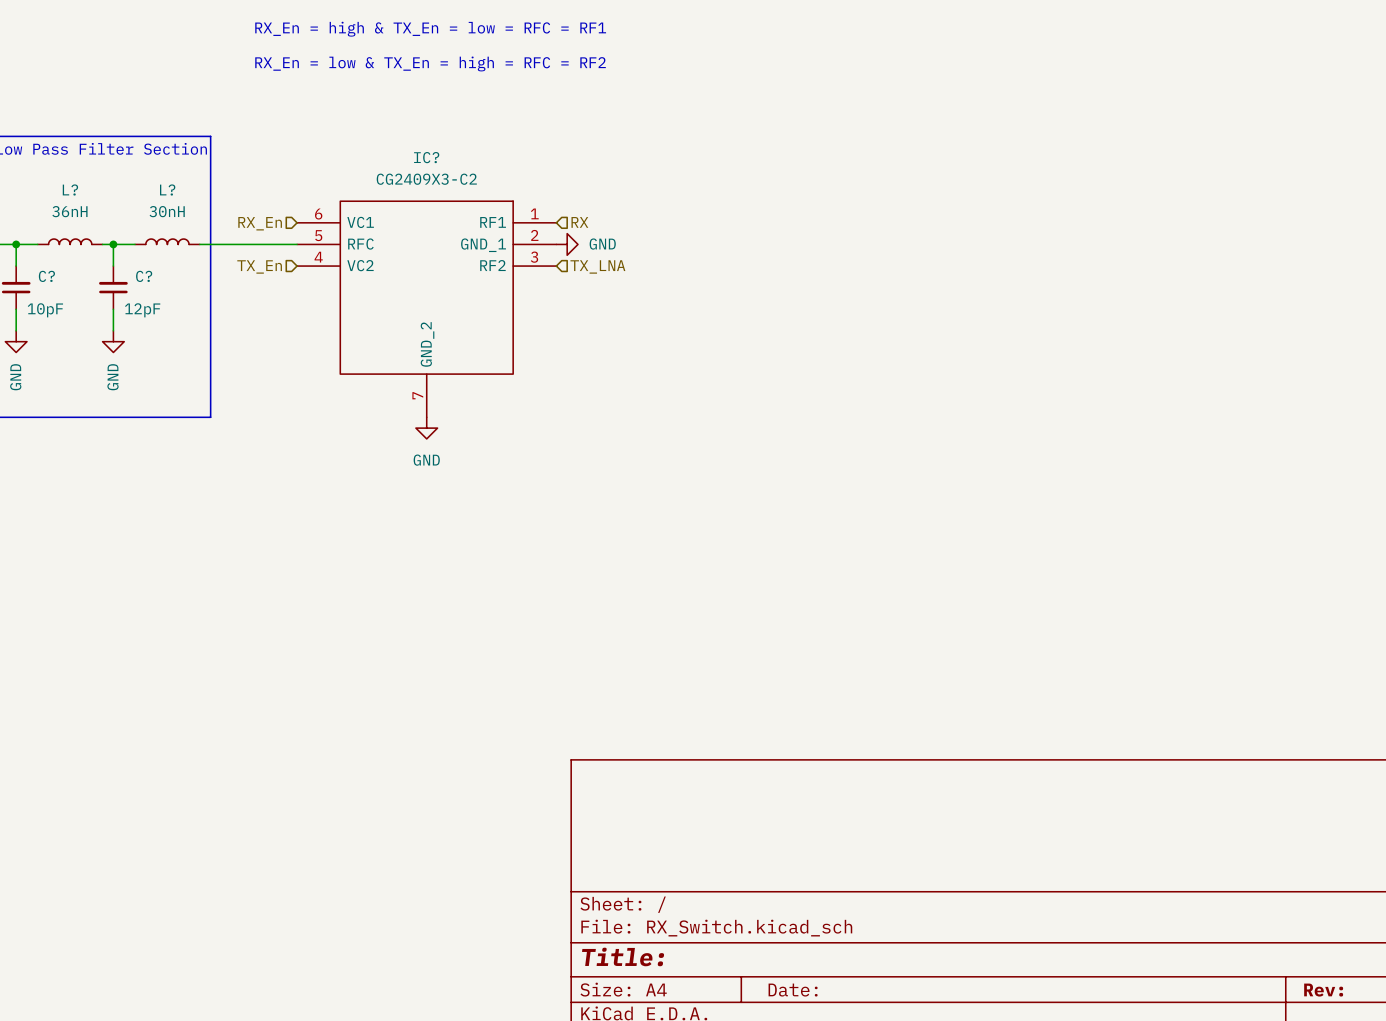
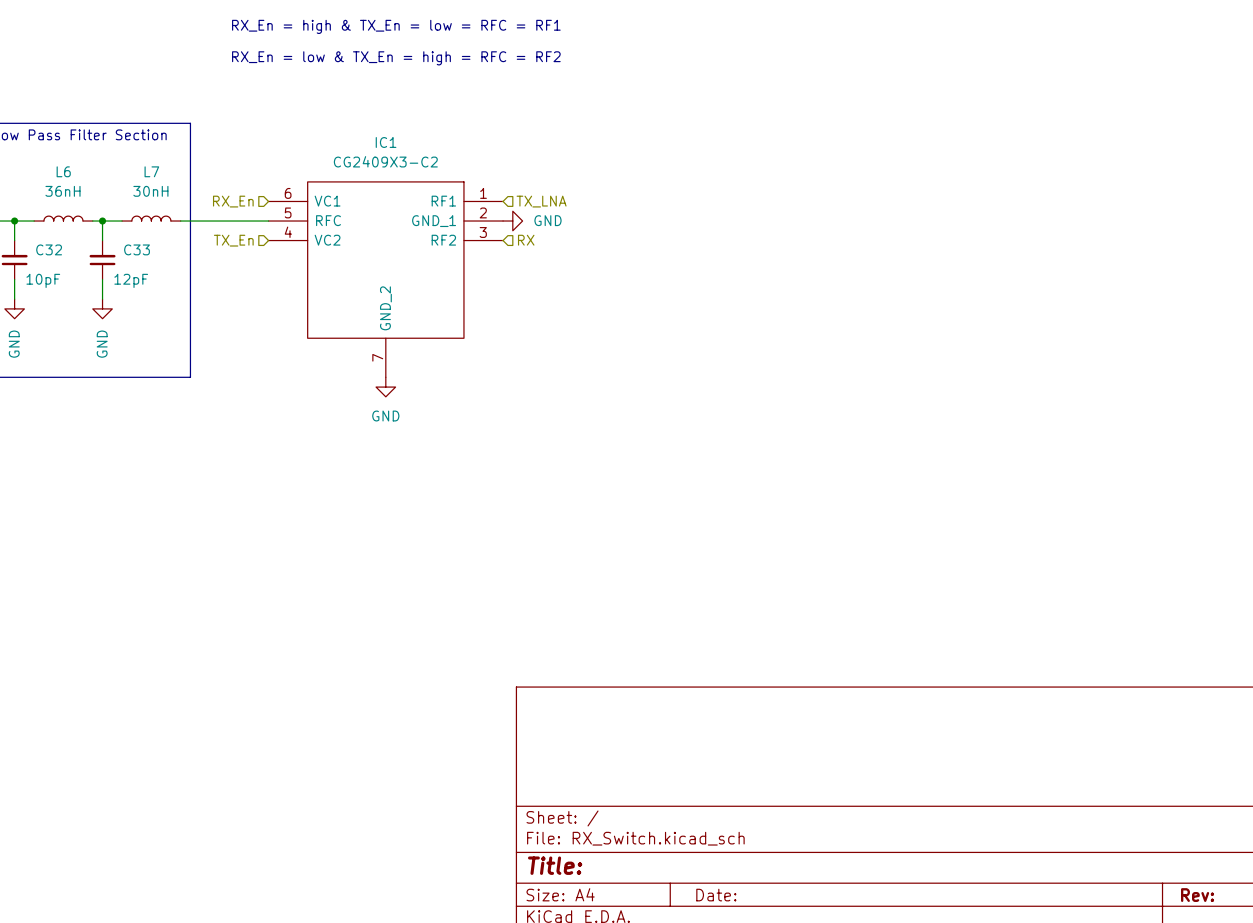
IC? name: IC? (426, 157) -> IC1 (386, 142)
L? name: L? (70, 189) -> L6 (63, 171)
L? name: L? (167, 189) -> L7 (151, 171)
hierarchical label: RX (579, 222) -> TX_LNA (541, 201)
hierarchical label: TX_LNA (597, 266) -> RX (526, 240)
C? name: C? (46, 276) -> C32 (49, 249)
C? name: C? (144, 276) -> C33 (137, 249)

